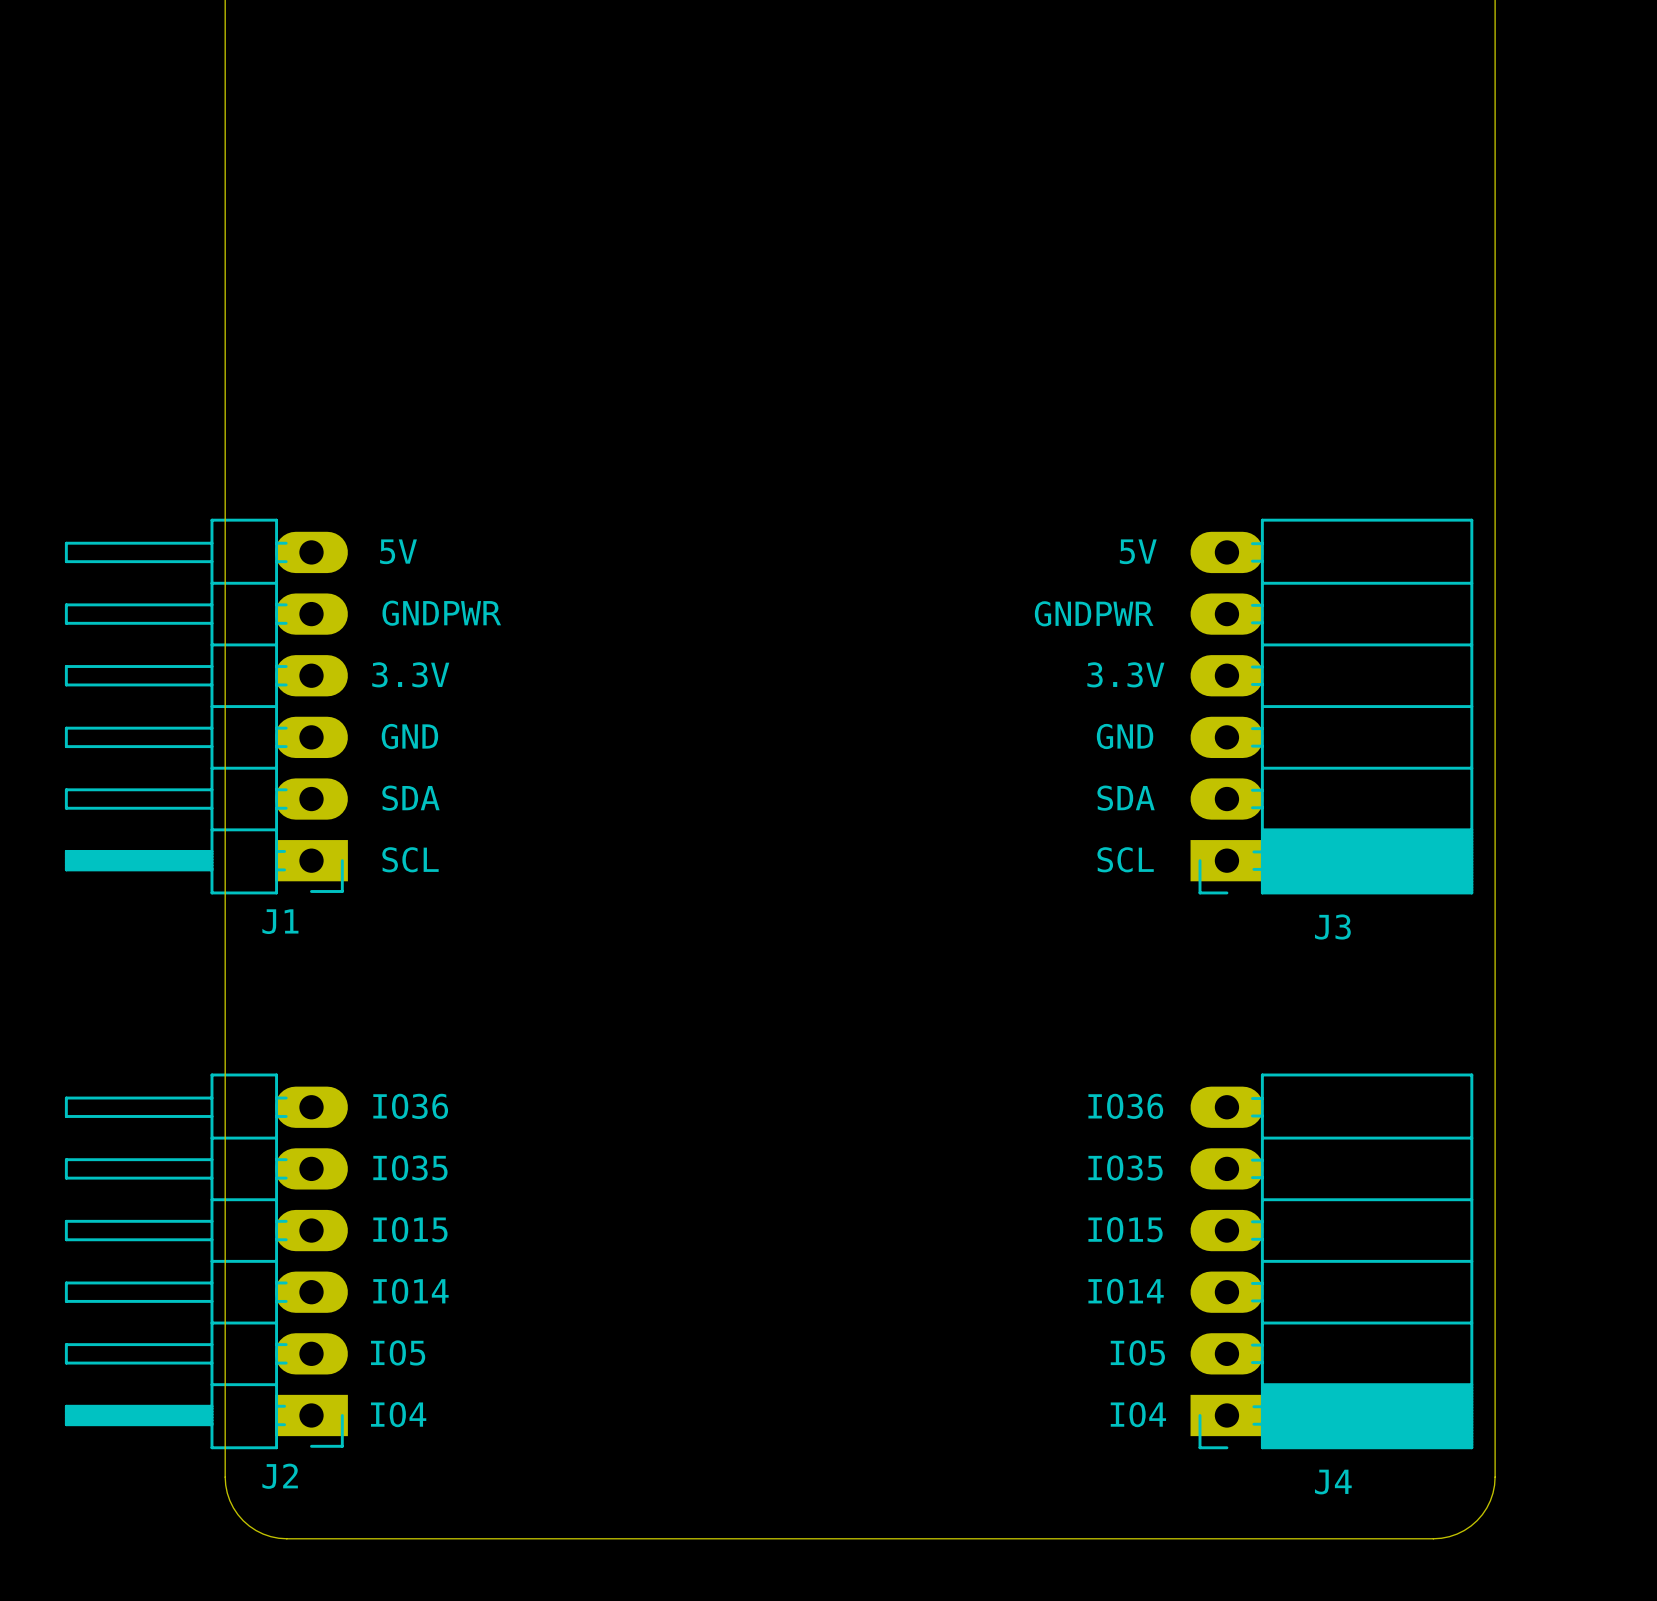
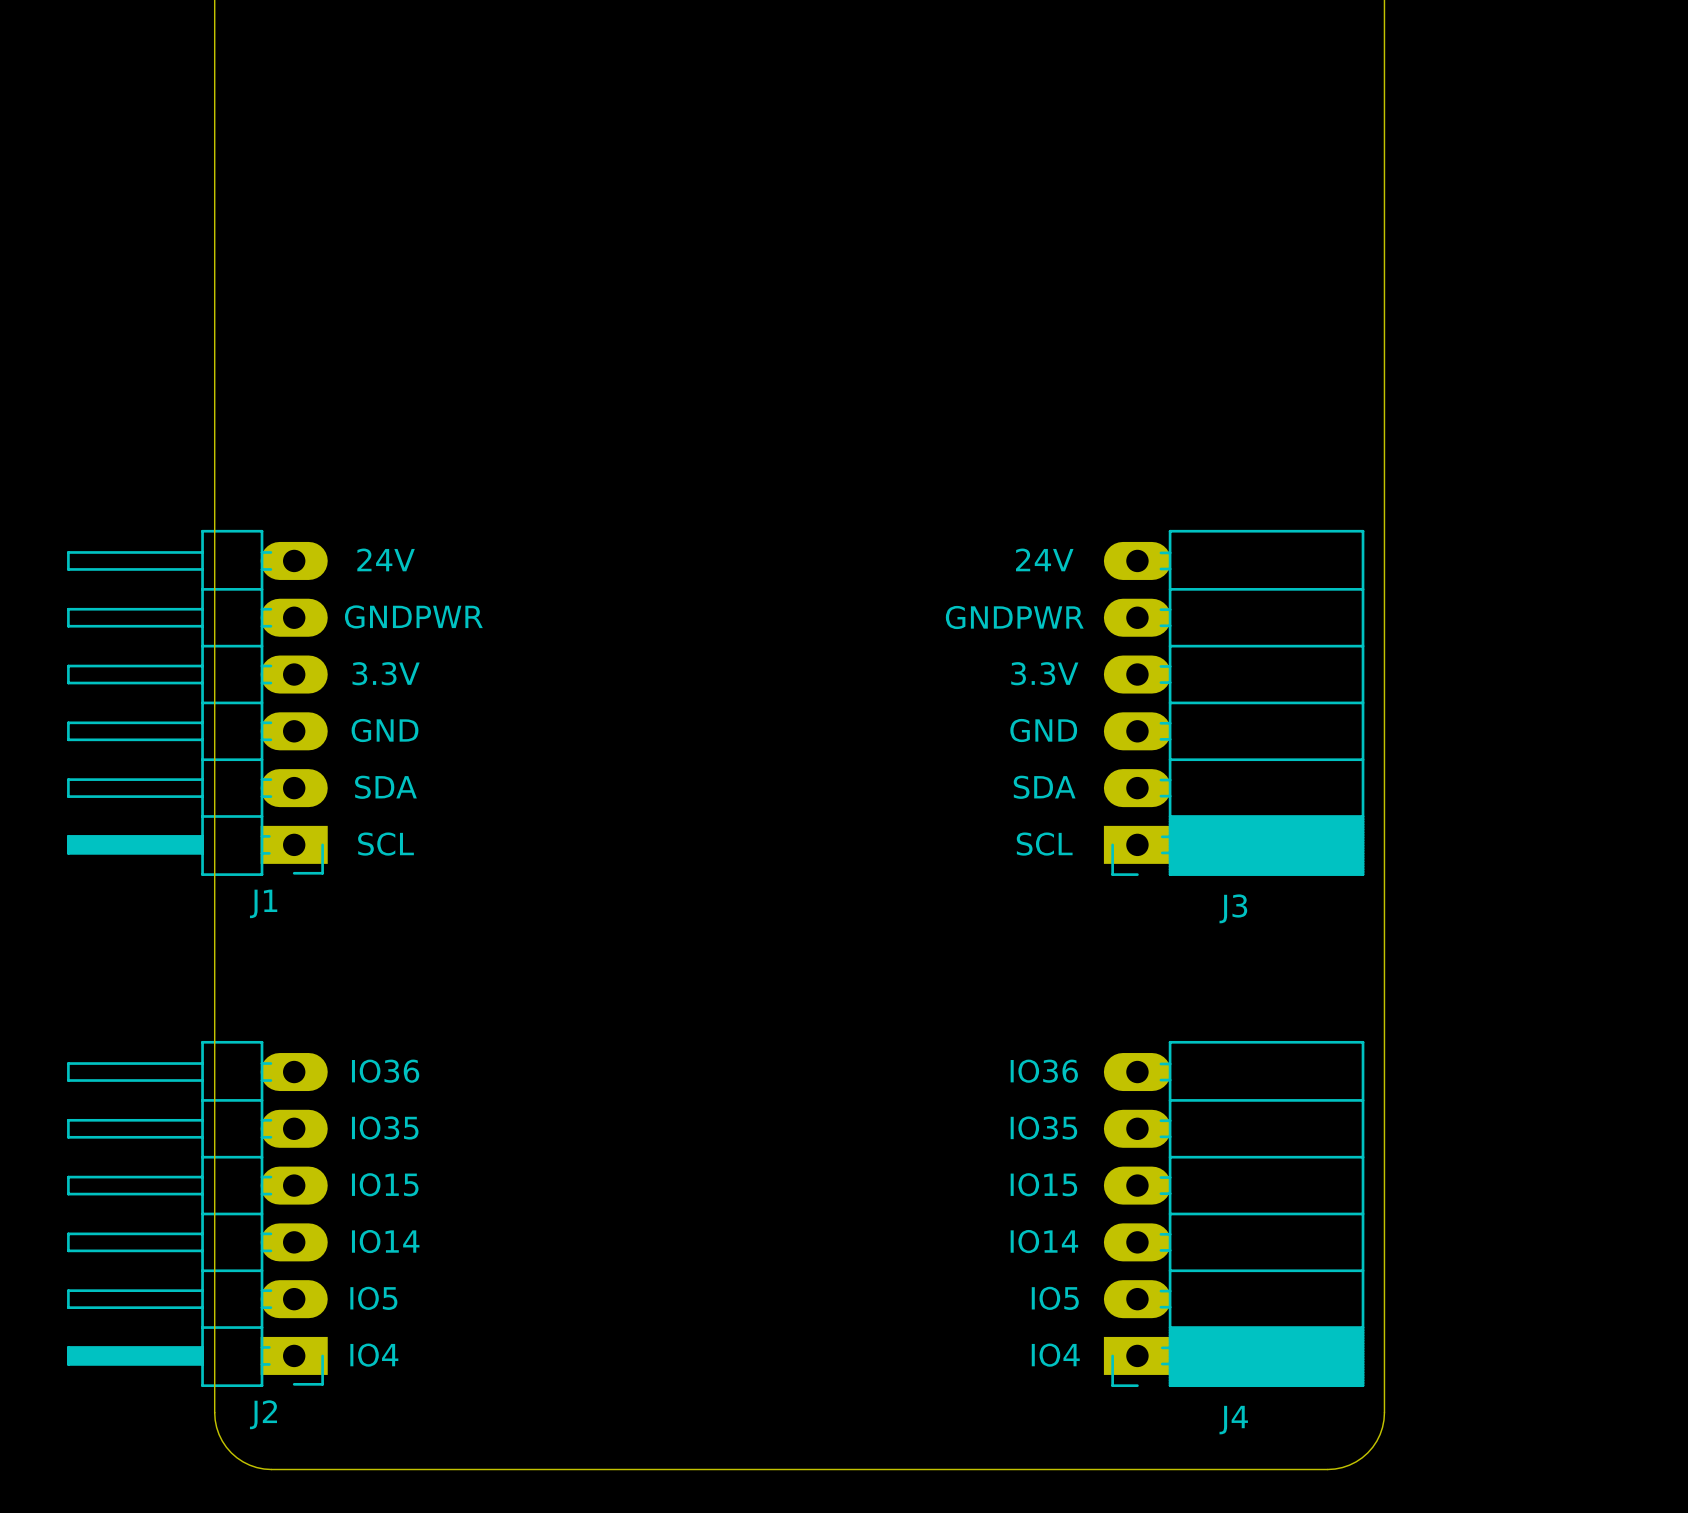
text: 5V (398, 551) -> 24V (386, 559)
text: 5V (1138, 551) -> 24V (1044, 559)

